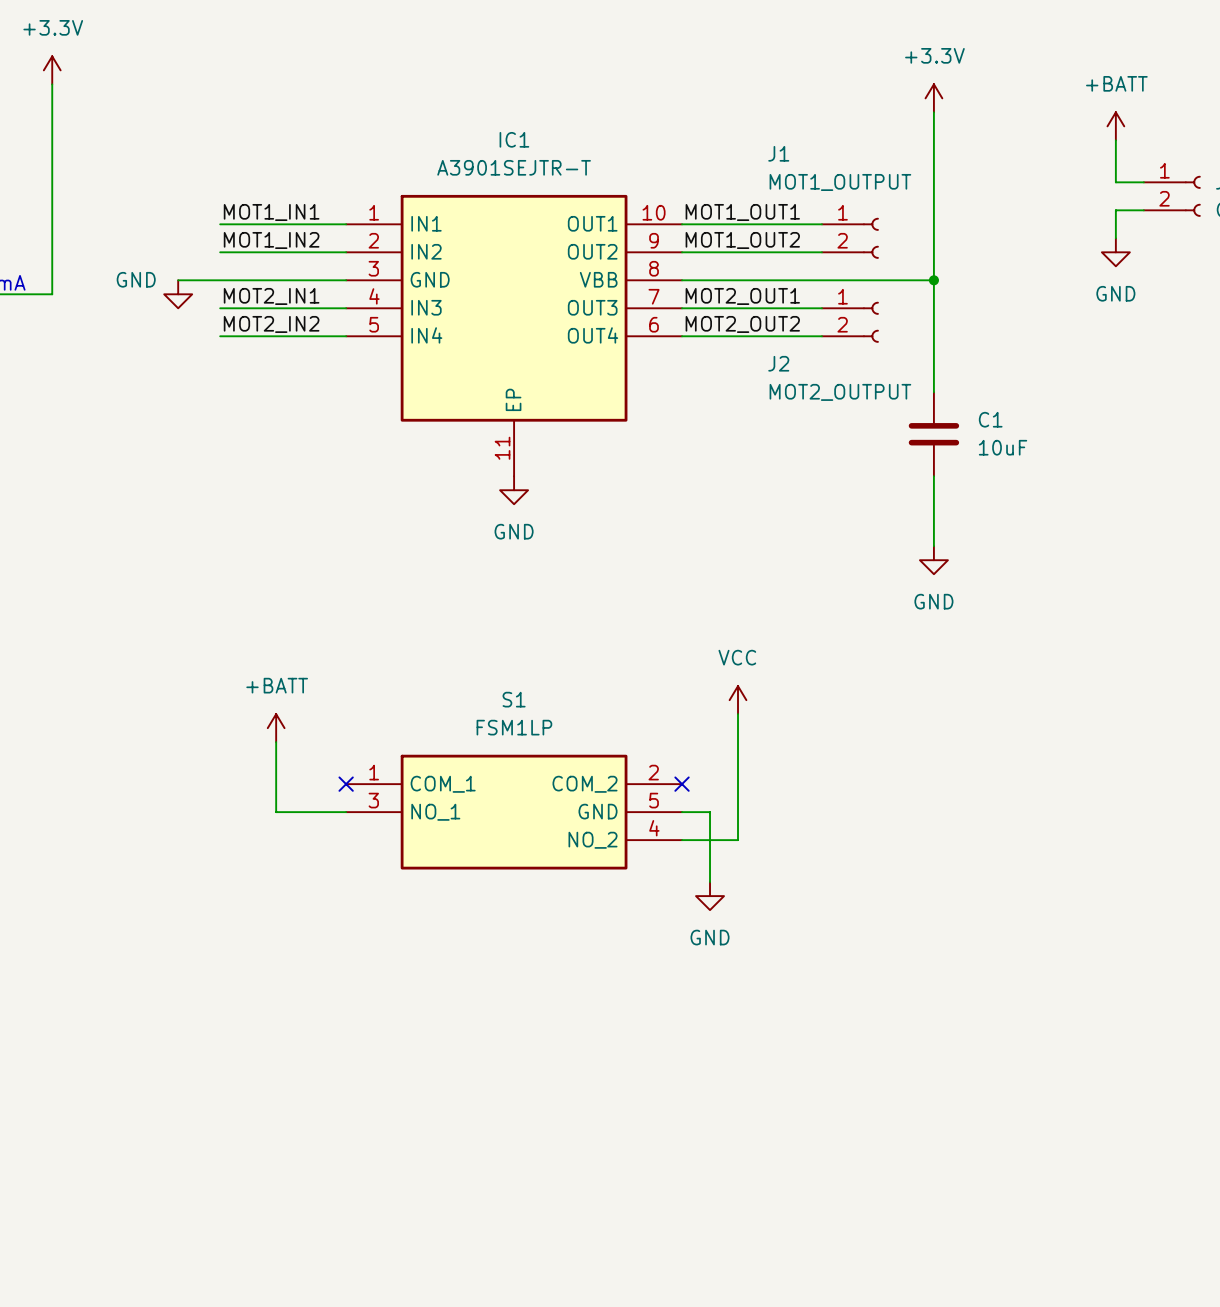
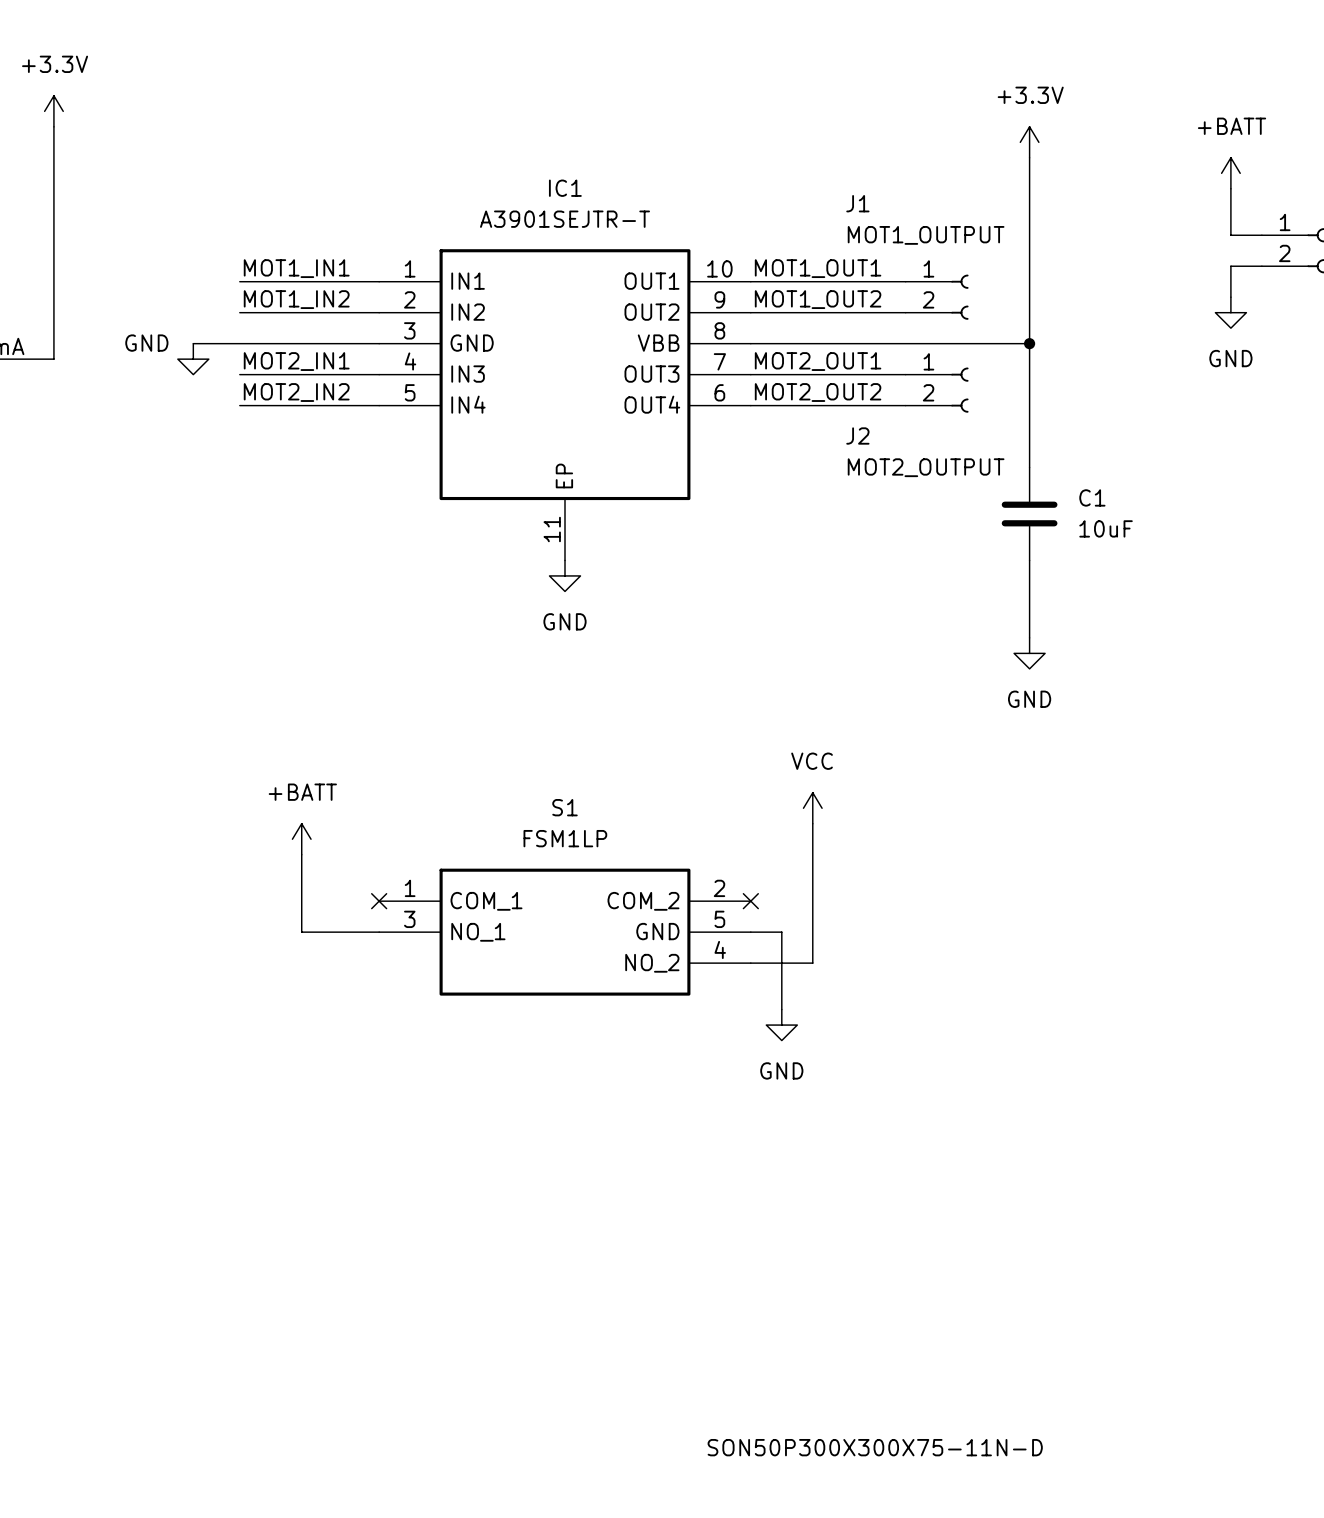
IC1 text: none -> SON50P300X300X75-11N-D (875, 1447)

